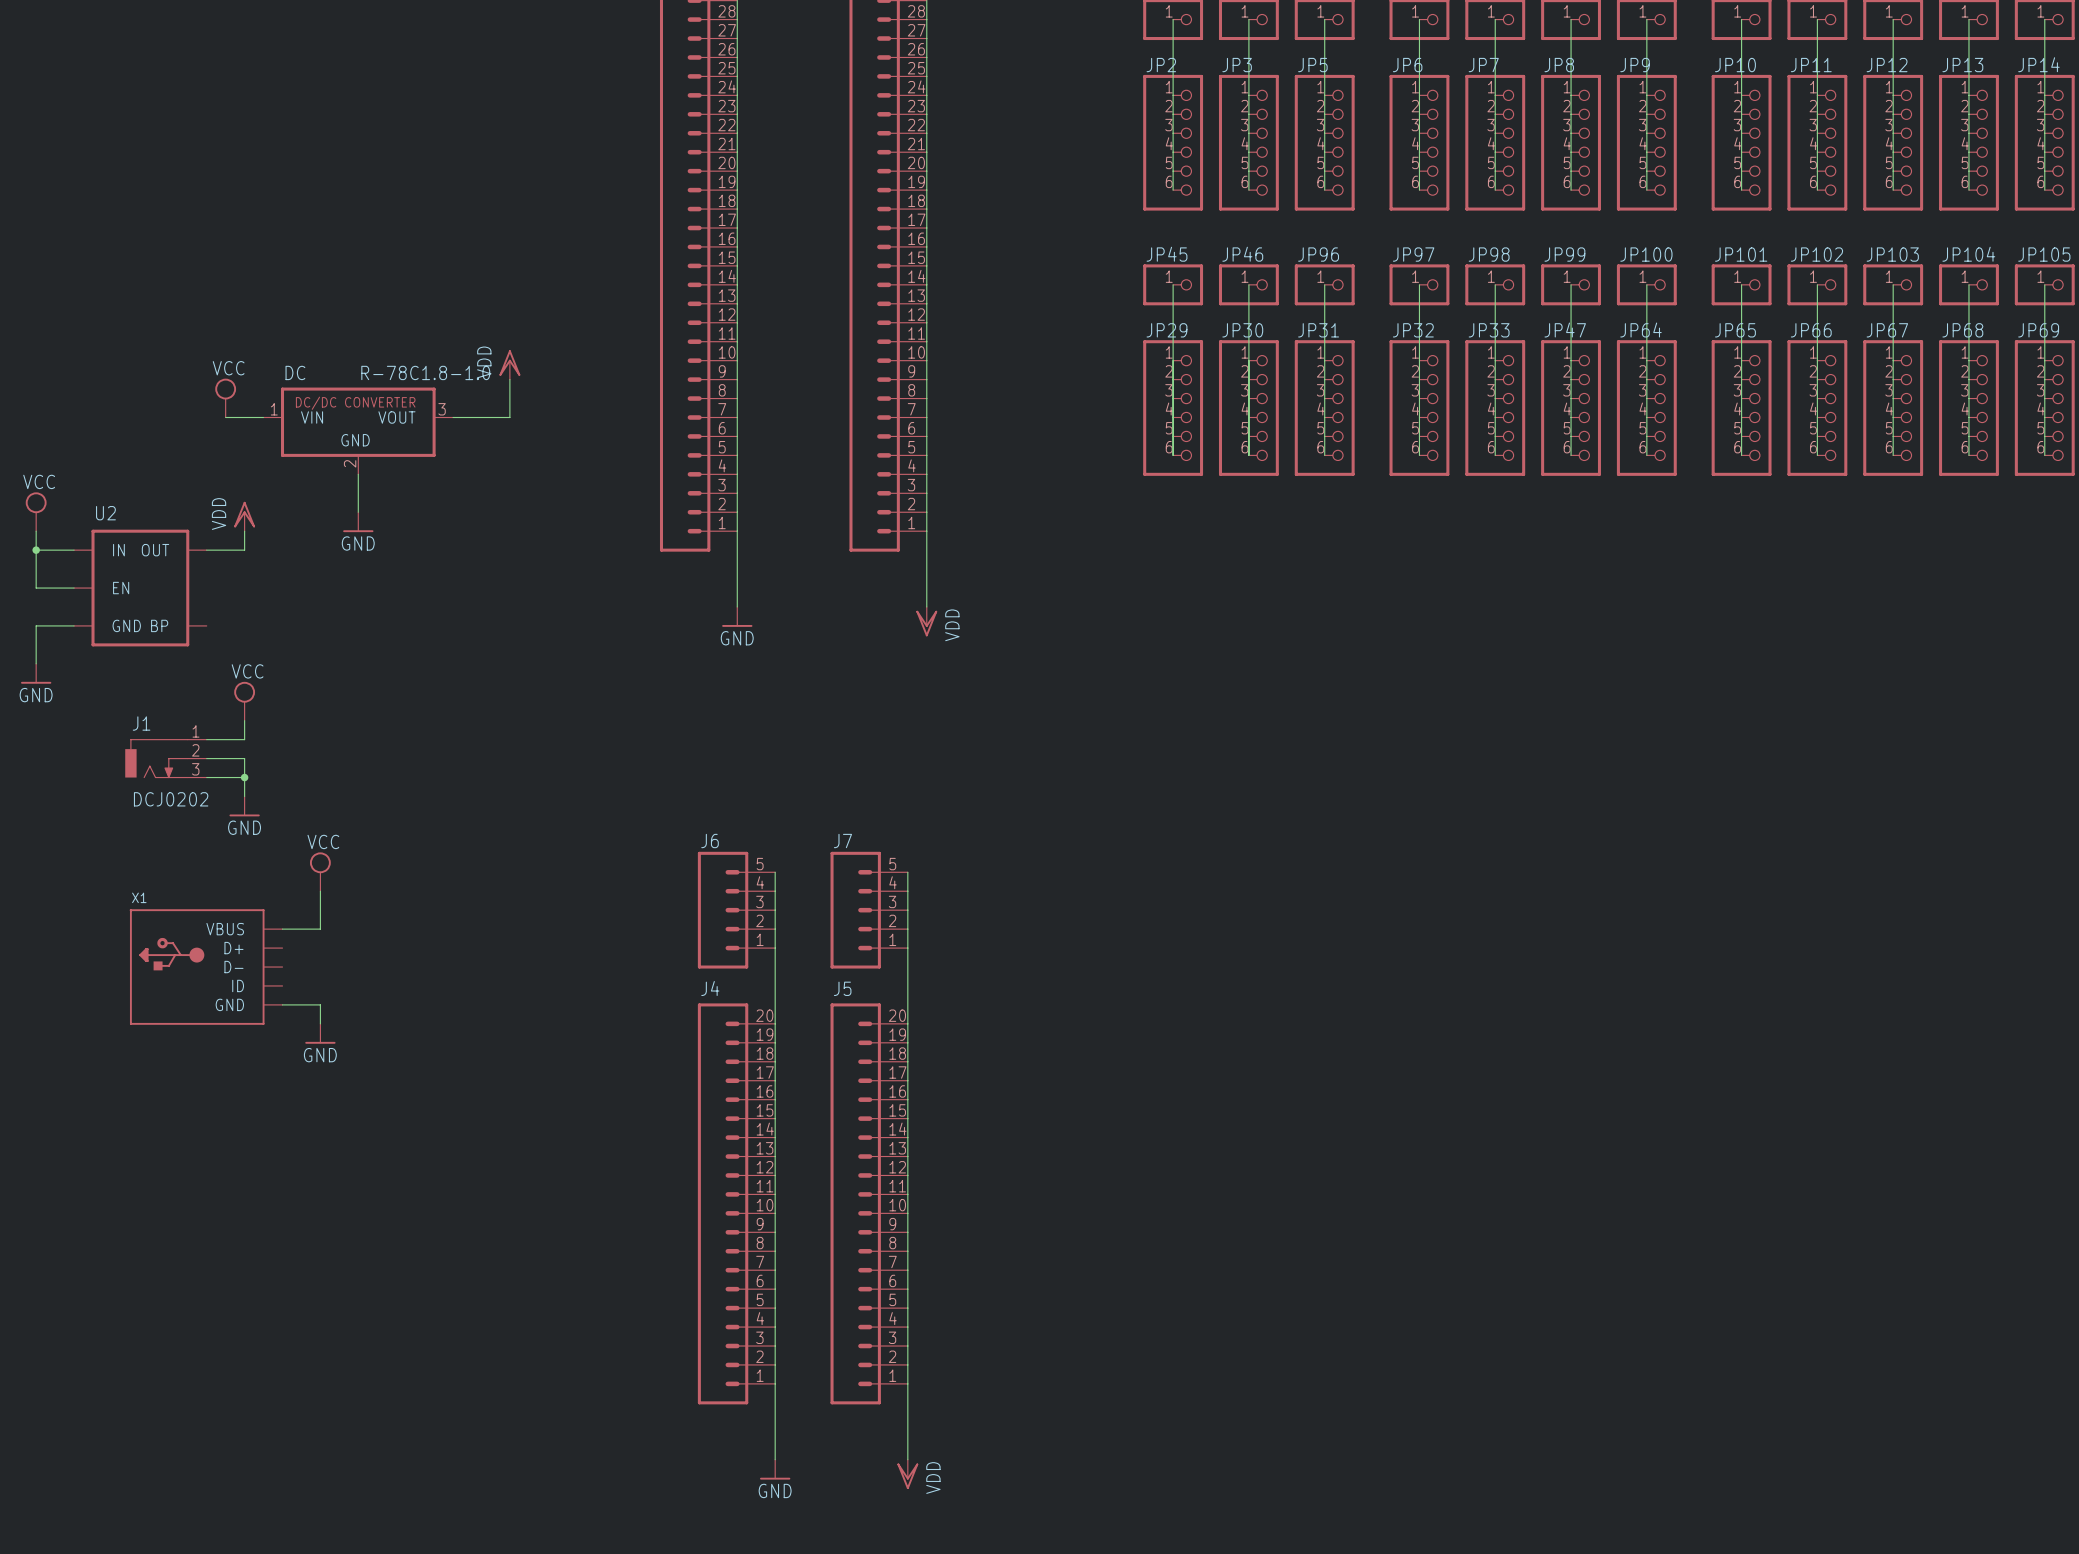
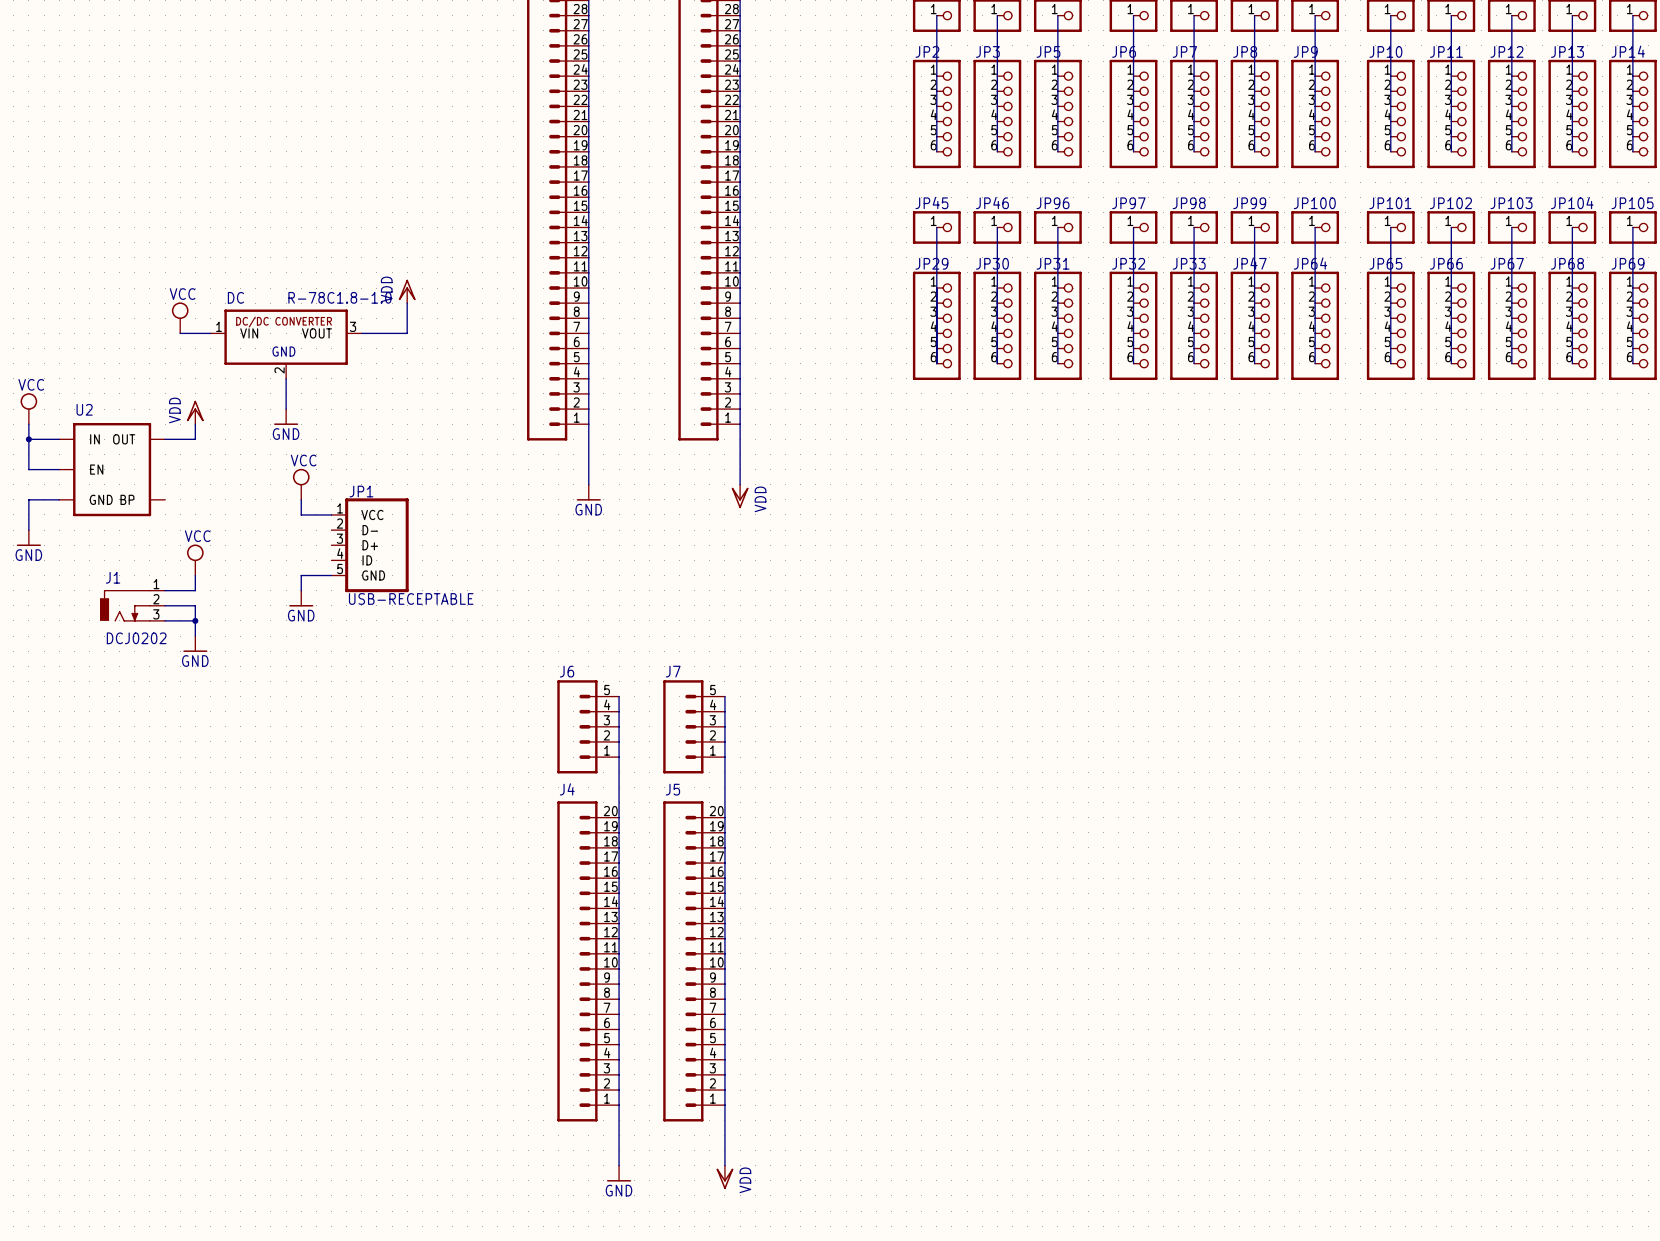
power symbol: none -> VCC (301, 484)
wire: none -> (301, 499) (301, 514) (331, 514)
JP1: none -> USB-RECEPTABLE (370, 545)
wire: none -> (331, 575) (301, 575) (301, 590)
power symbol: none -> GND (301, 598)
power symbol: VCC (320, 871) -> none
wire: (320, 891) (320, 929) (282, 929) -> none
X1: (206, 967) -> none
wire: (282, 1004) (320, 1004) (320, 1023) -> none
power symbol: GND (320, 1033) -> none

